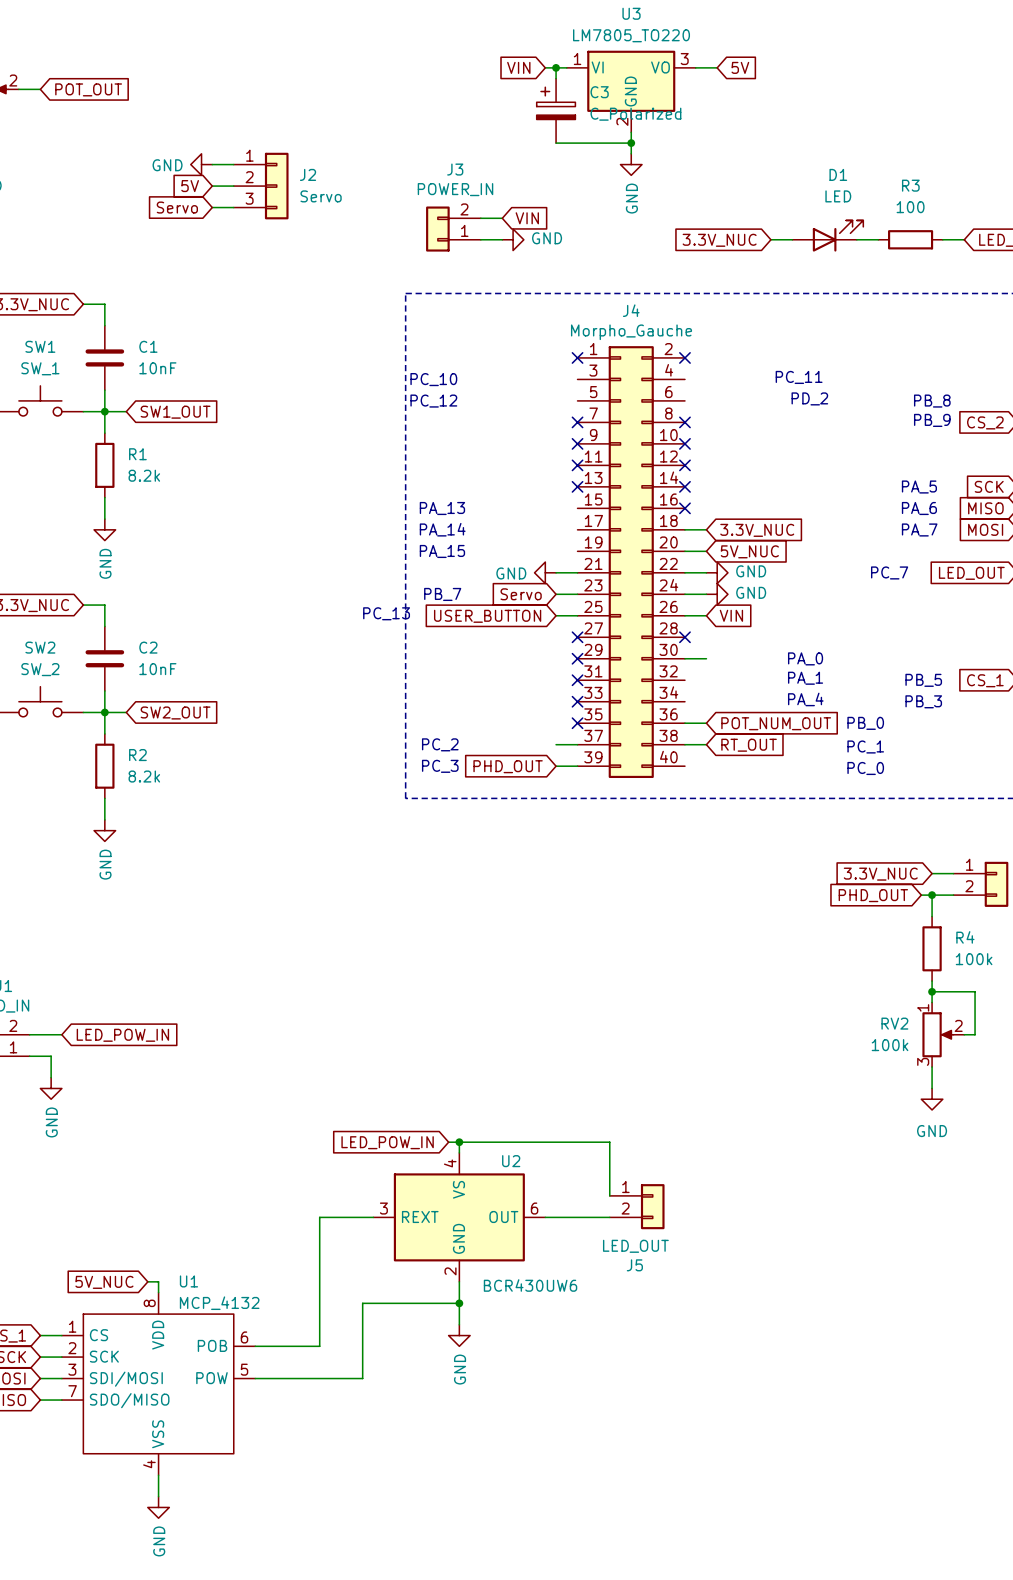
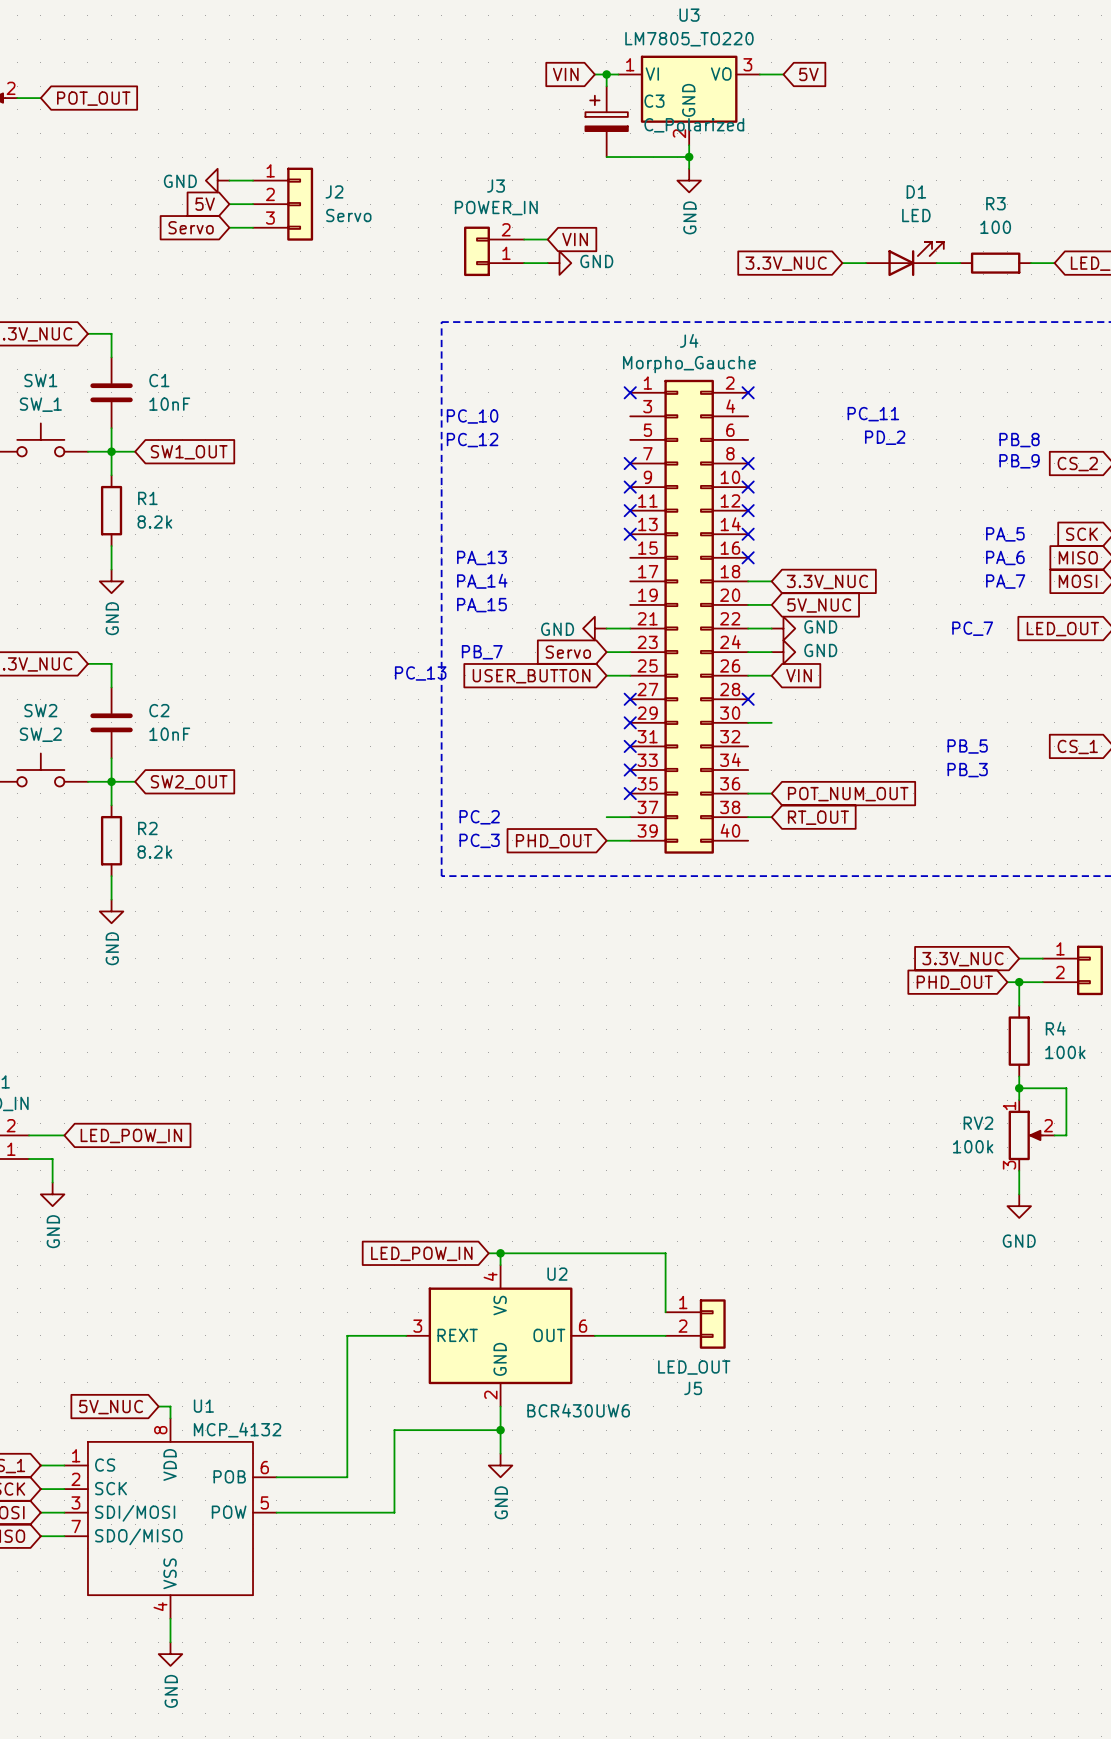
text: PA_0 (805, 658) -> none
text: PA_1 (805, 678) -> none
text position: PB_5 (923, 680) -> PB_5 (967, 746)
text: PA_4 (805, 699) -> none
text position: PB_3 (923, 701) -> PB_3 (967, 770)
text: PB_0 (865, 723) -> none
text: PC_1 (865, 746) -> none
text: PC_0 (865, 768) -> none

